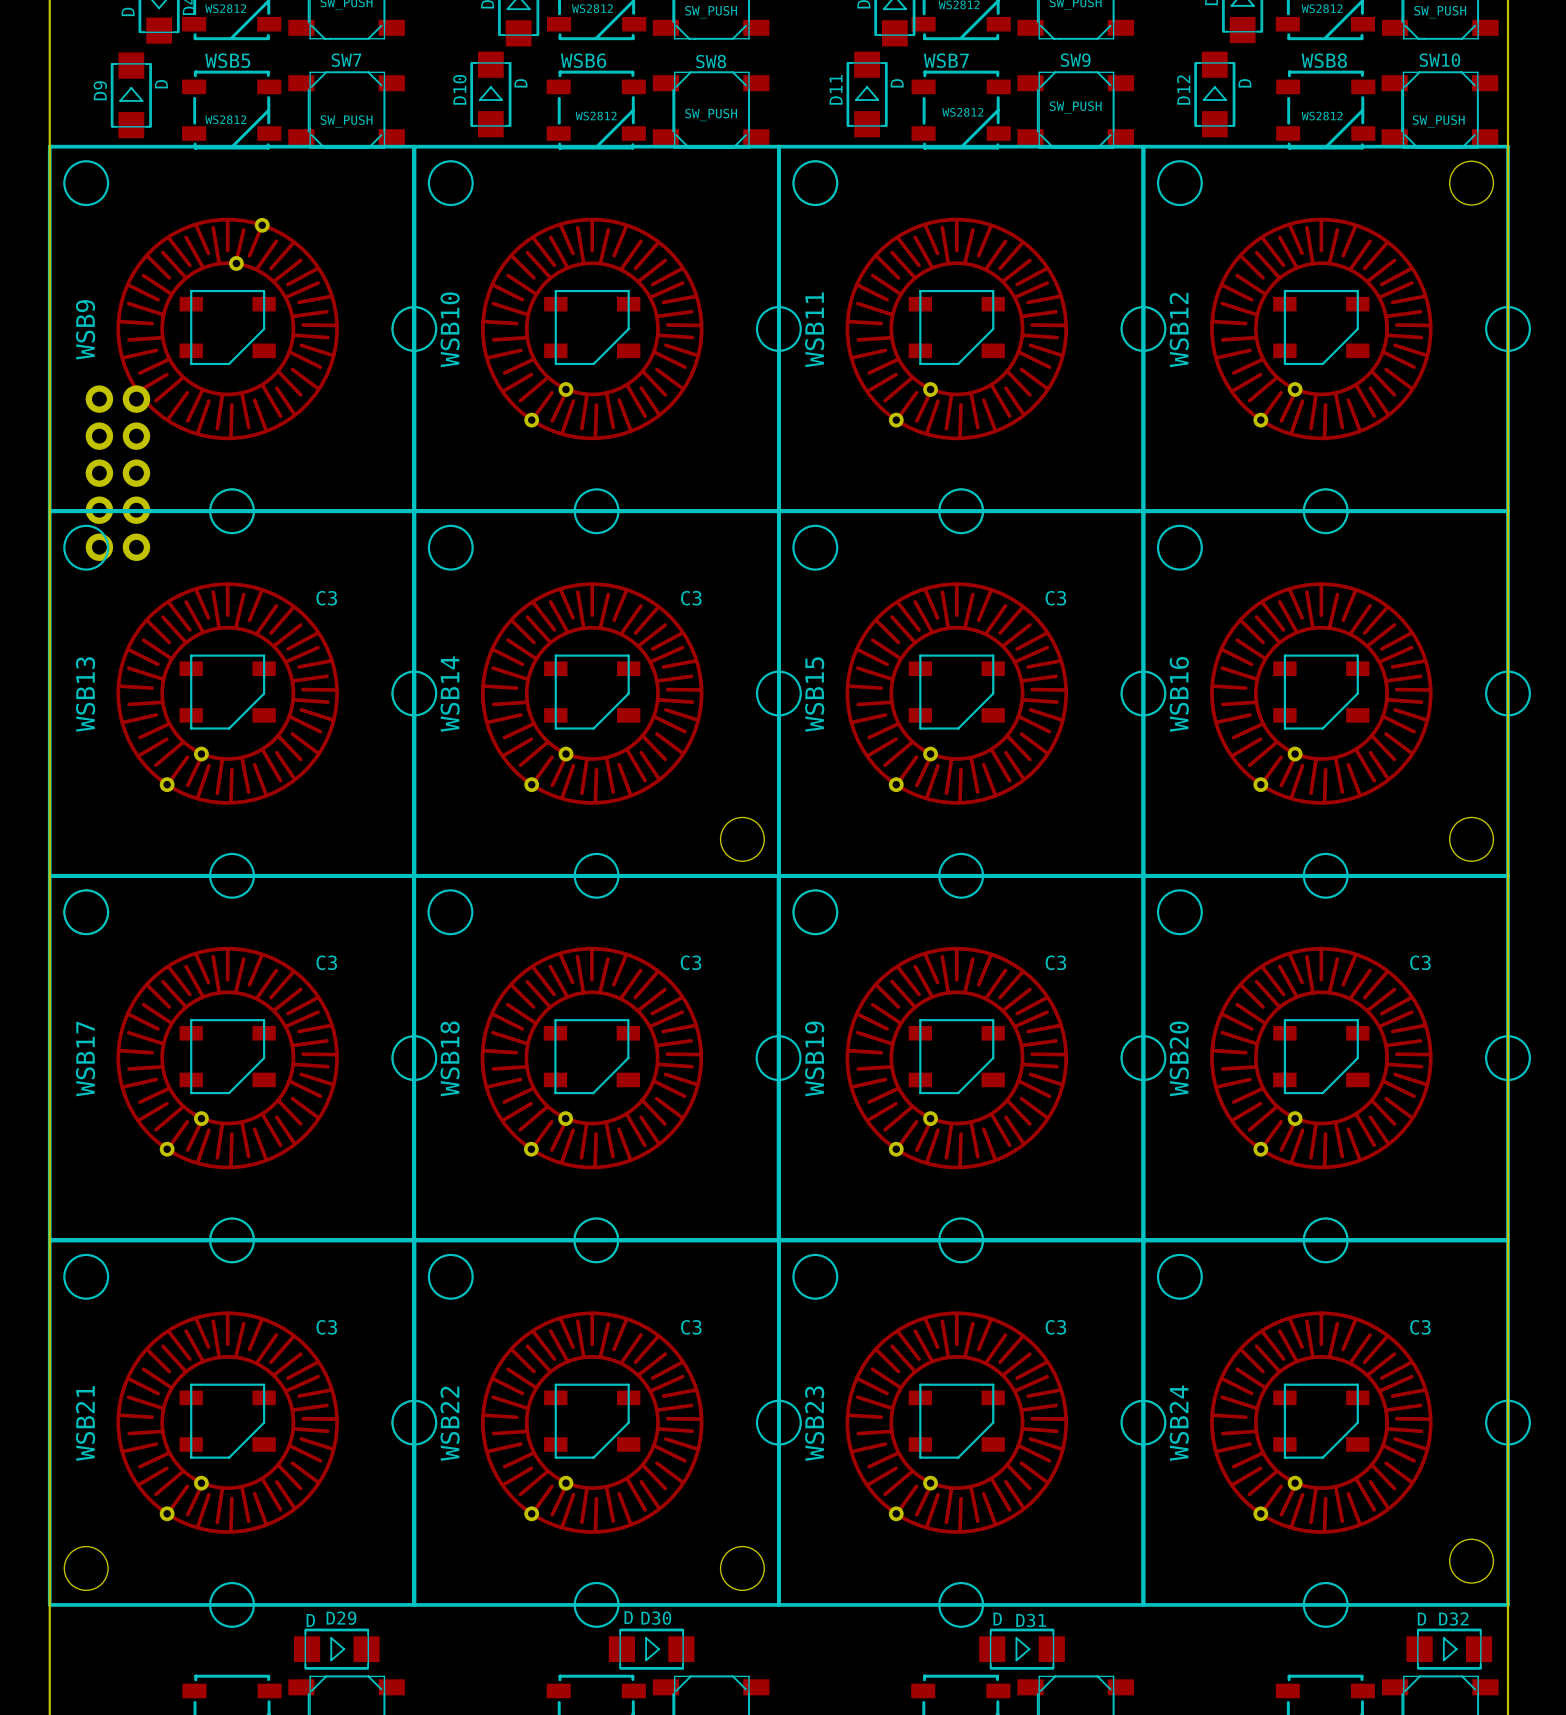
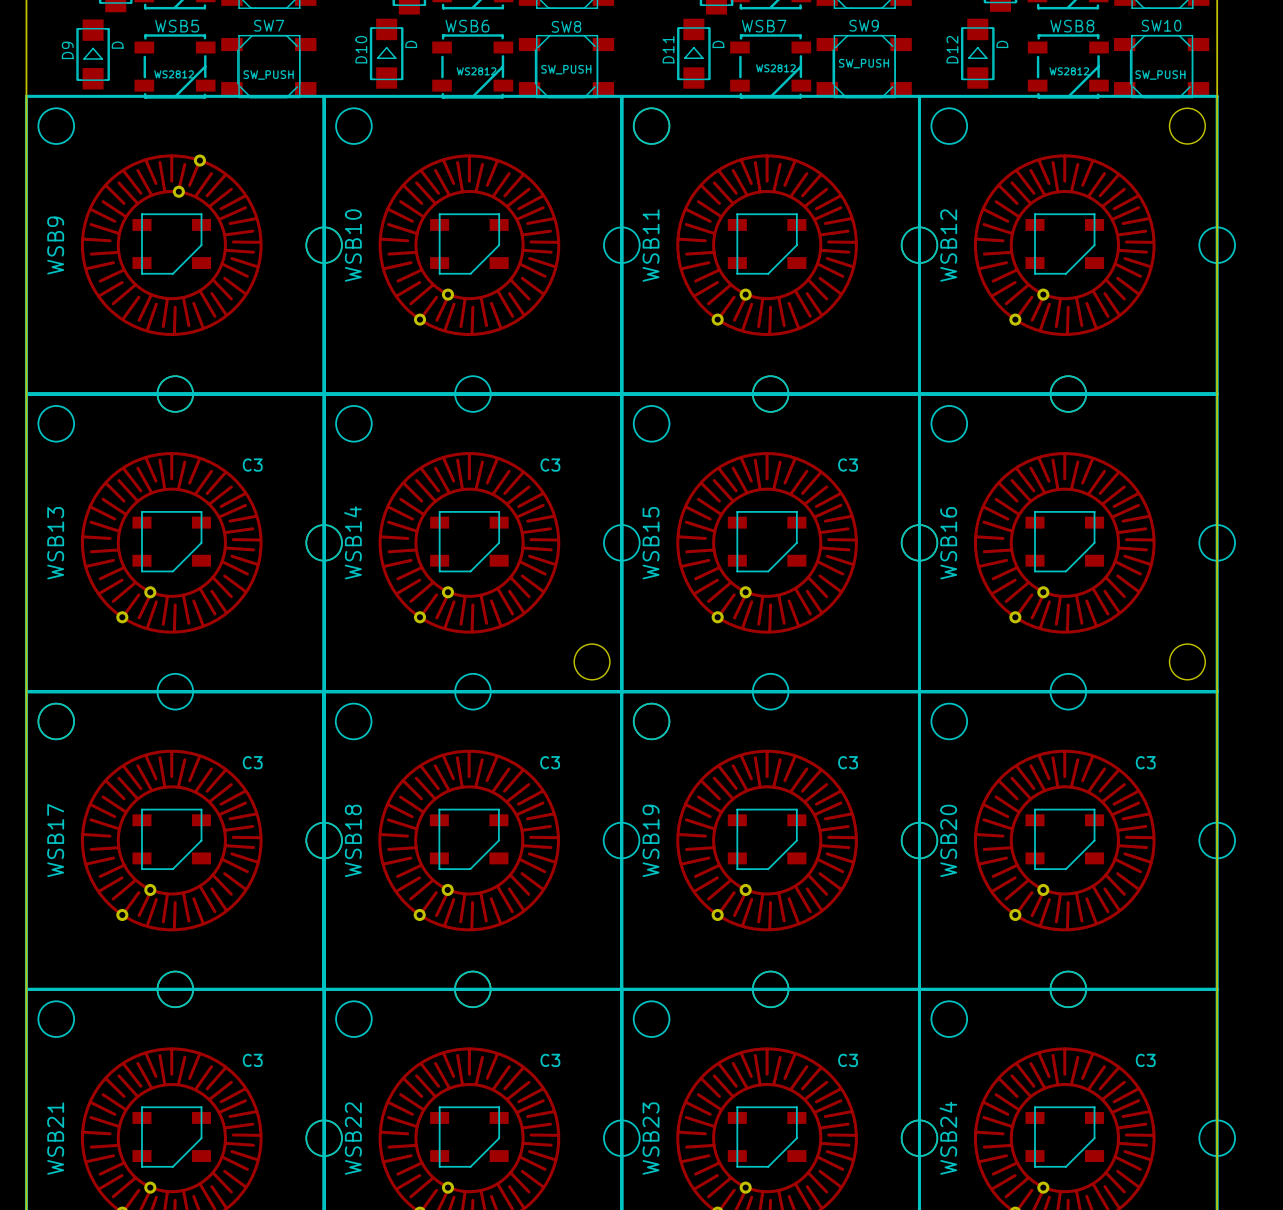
part: (117, 473) -> none

